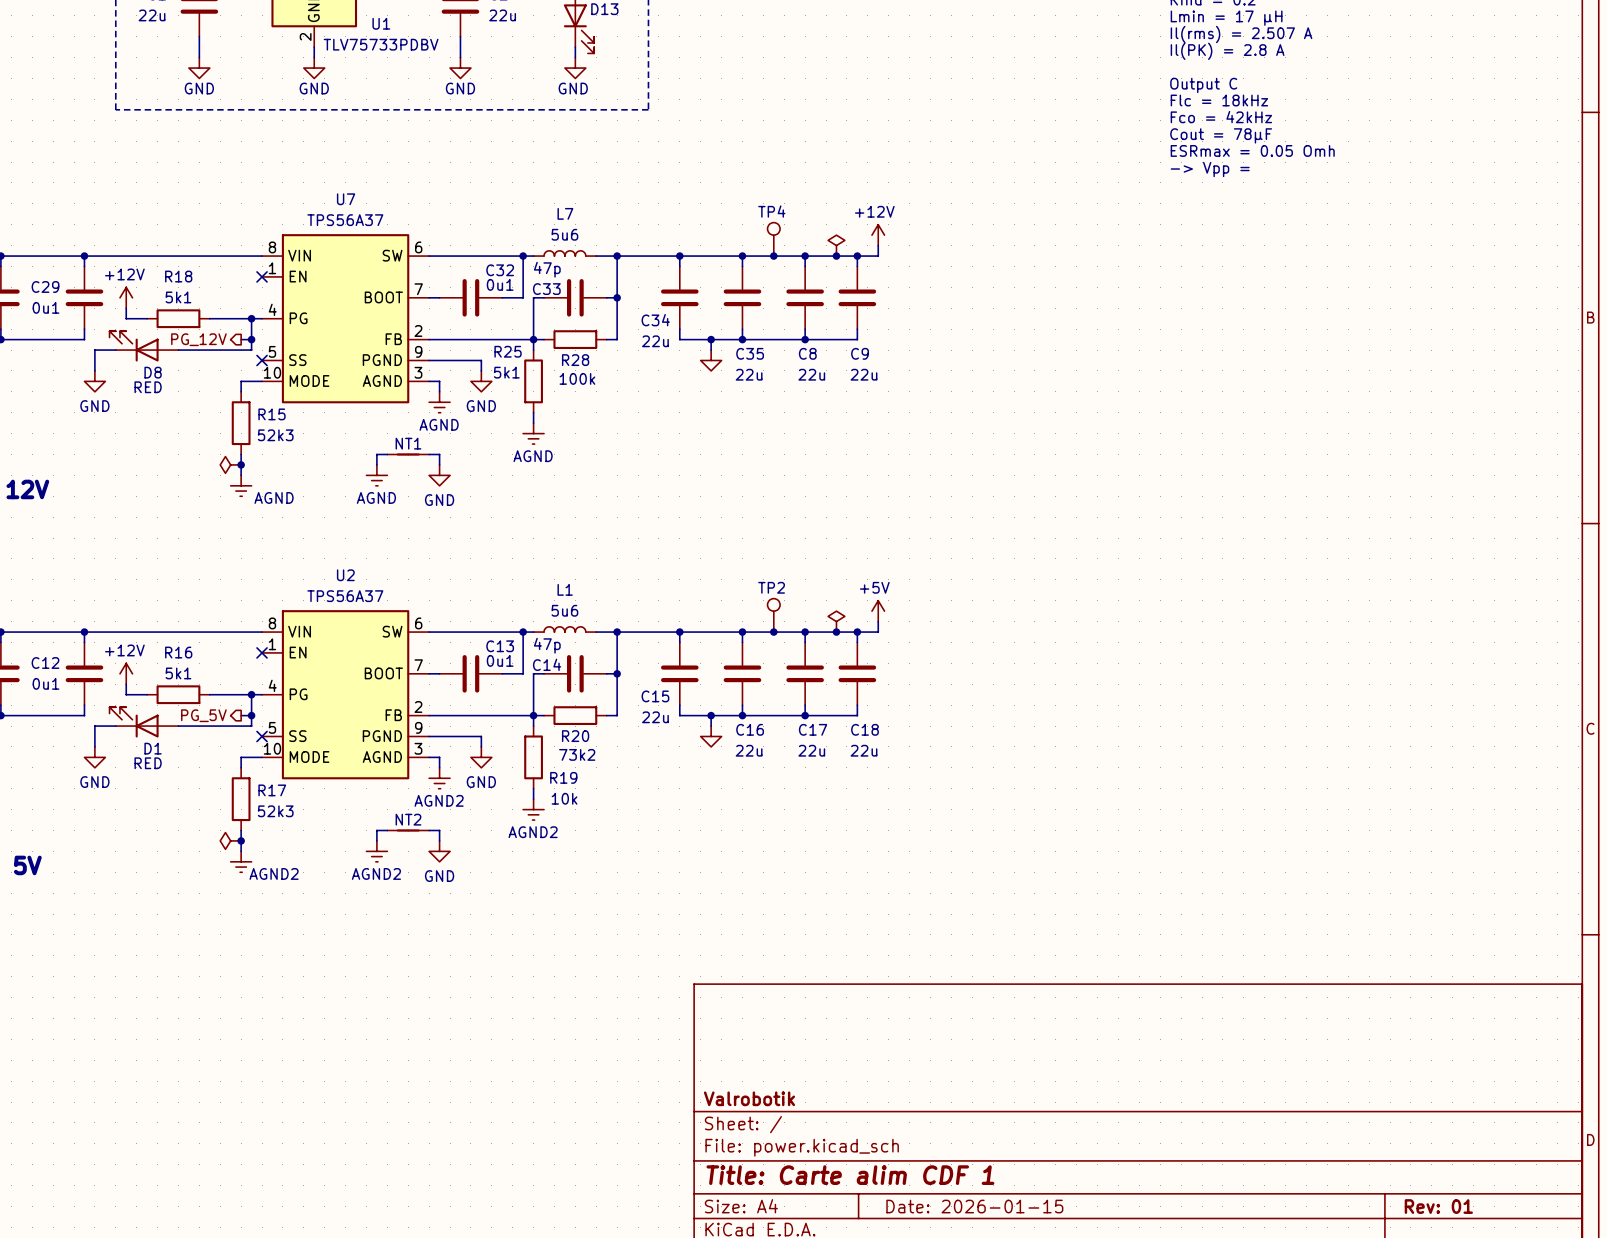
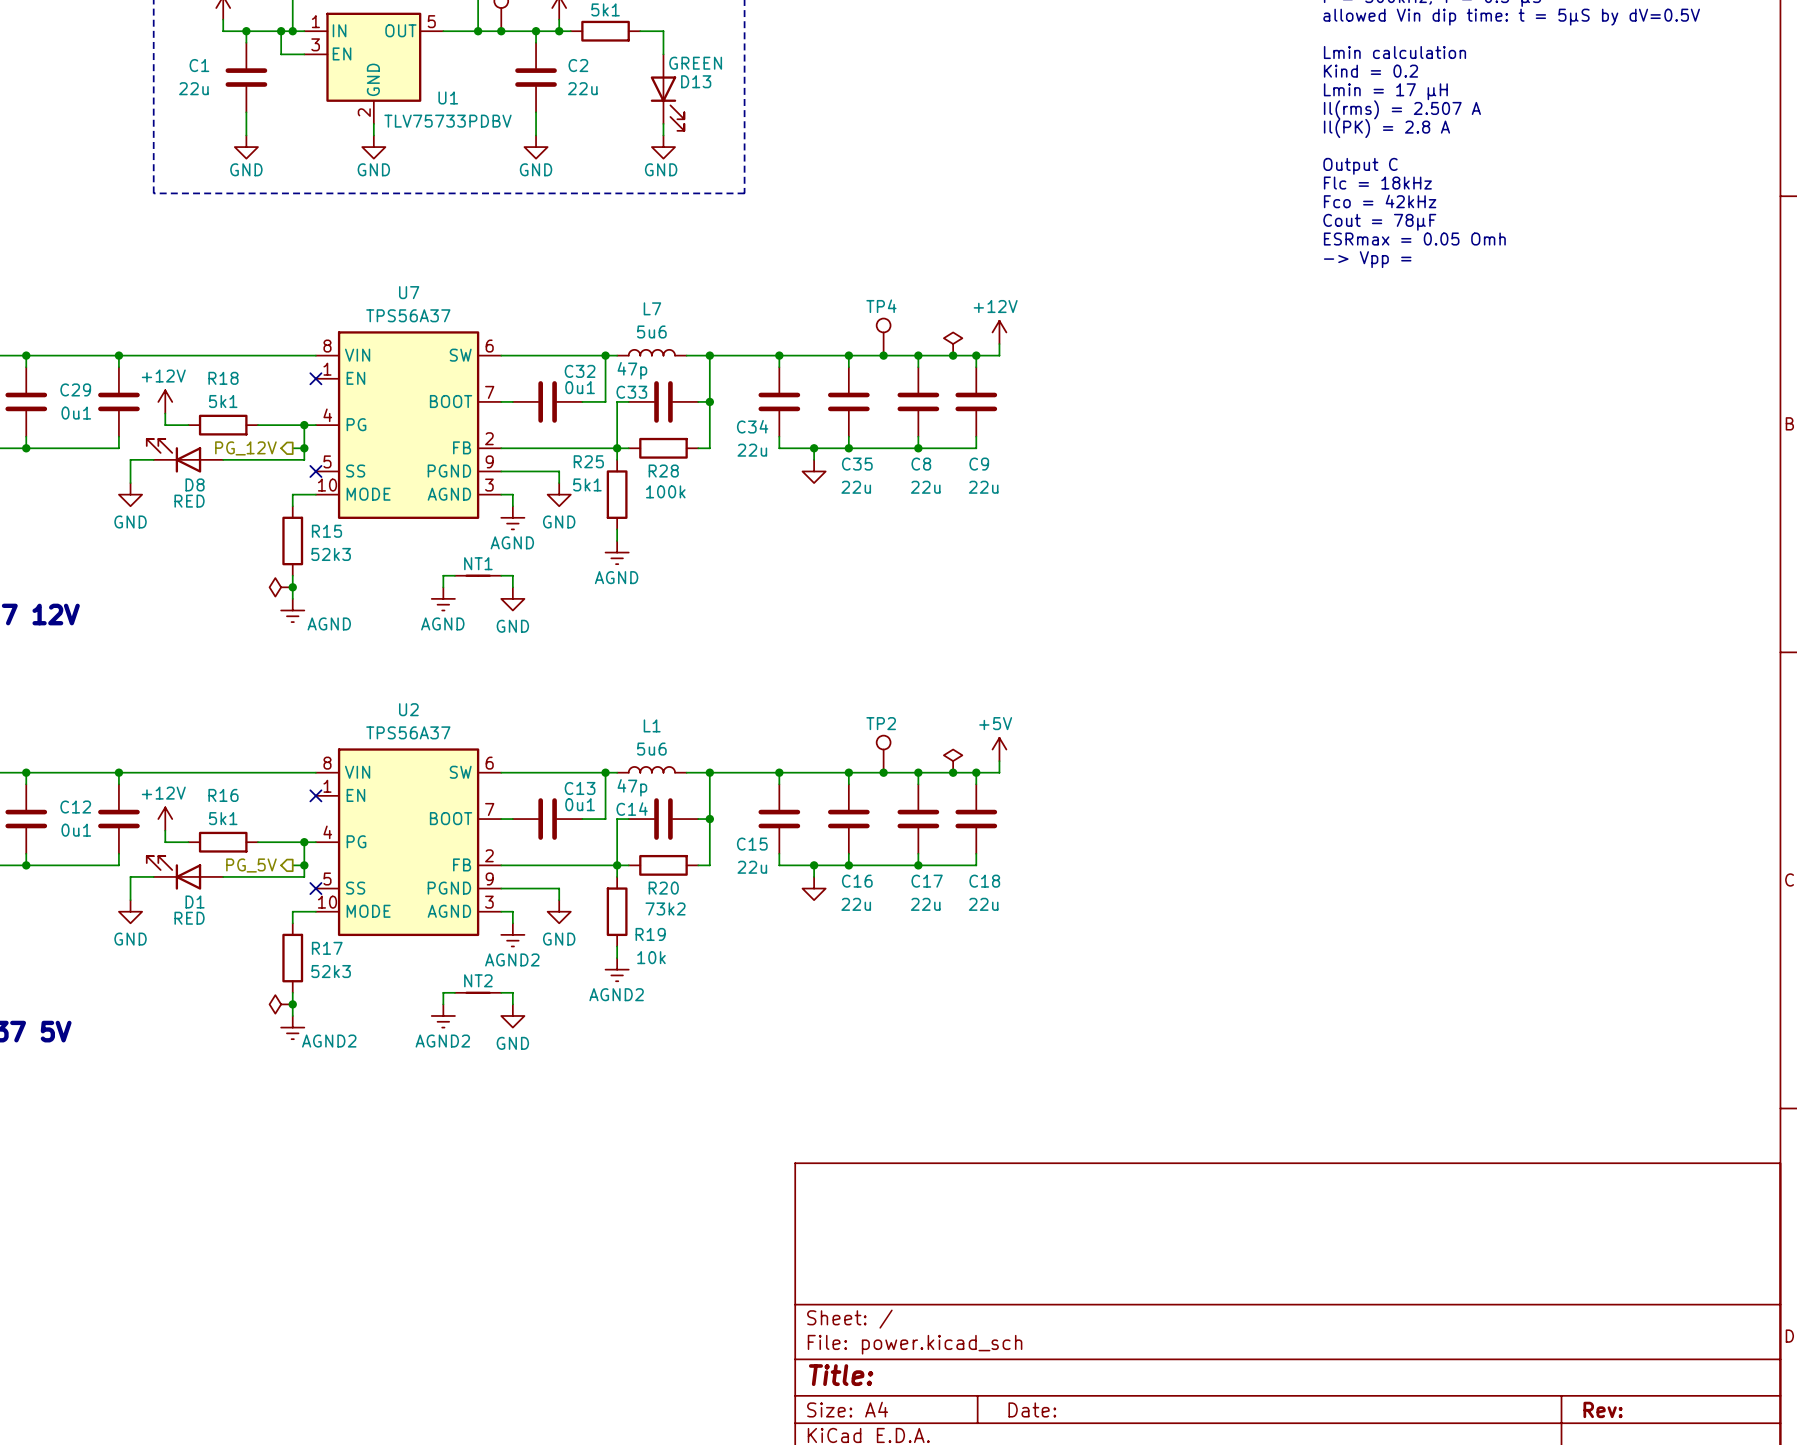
title block: Valrobotik (749, 1098) -> none
title block: Title: Carte alim CDF 1 (850, 1175) -> Title: (841, 1375)
title block: Date: 2026-01-15 (974, 1206) -> Date: (1032, 1409)
title block: Rev: 01 (1438, 1206) -> Rev: (1603, 1409)

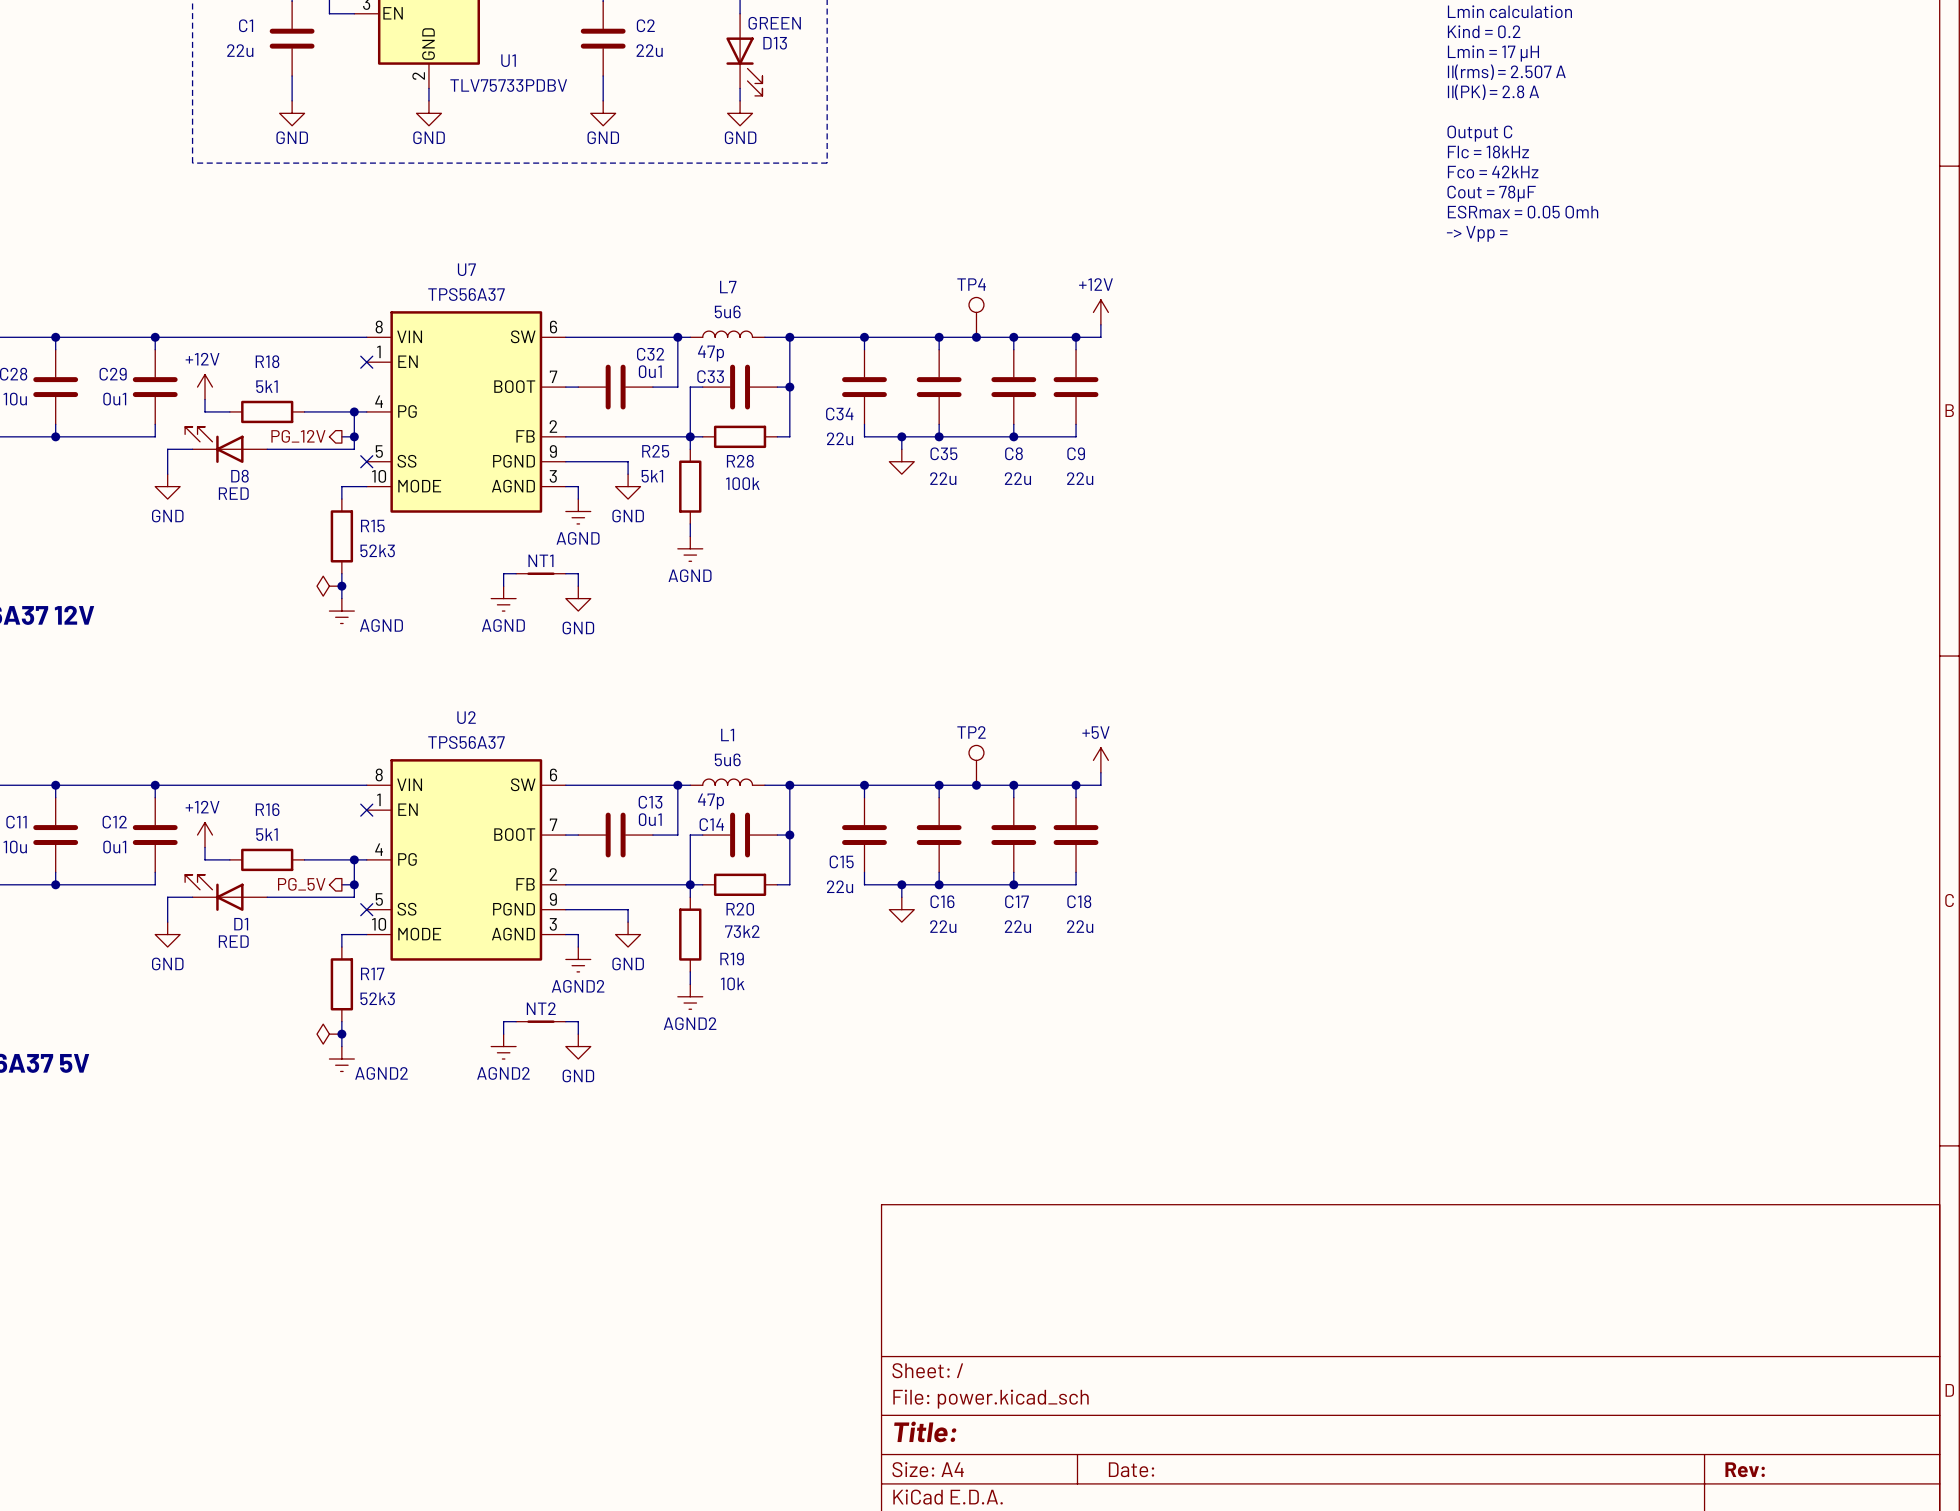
power symbol: (953, 344) -> none
junction: (953, 355) -> none
power symbol: (953, 761) -> none
junction: (953, 772) -> none

